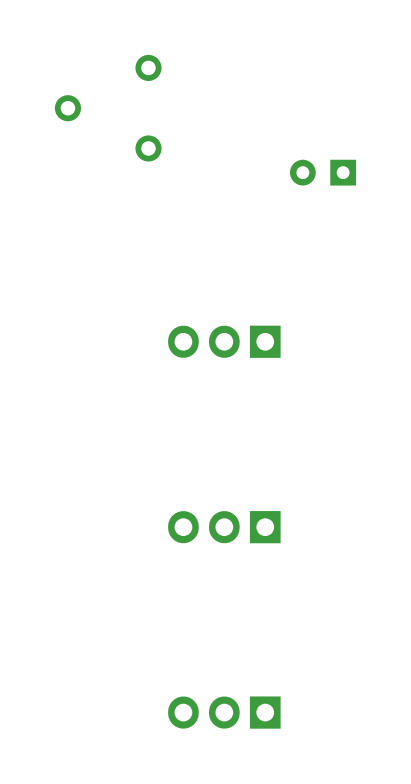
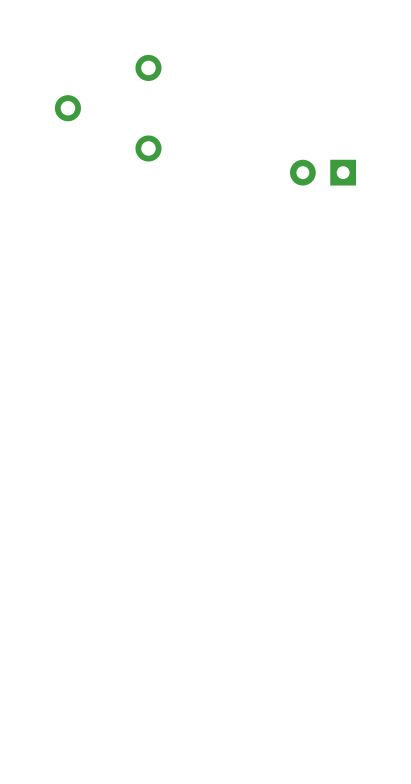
part: (224, 341) -> none
part: (224, 527) -> none
part: (224, 712) -> none

